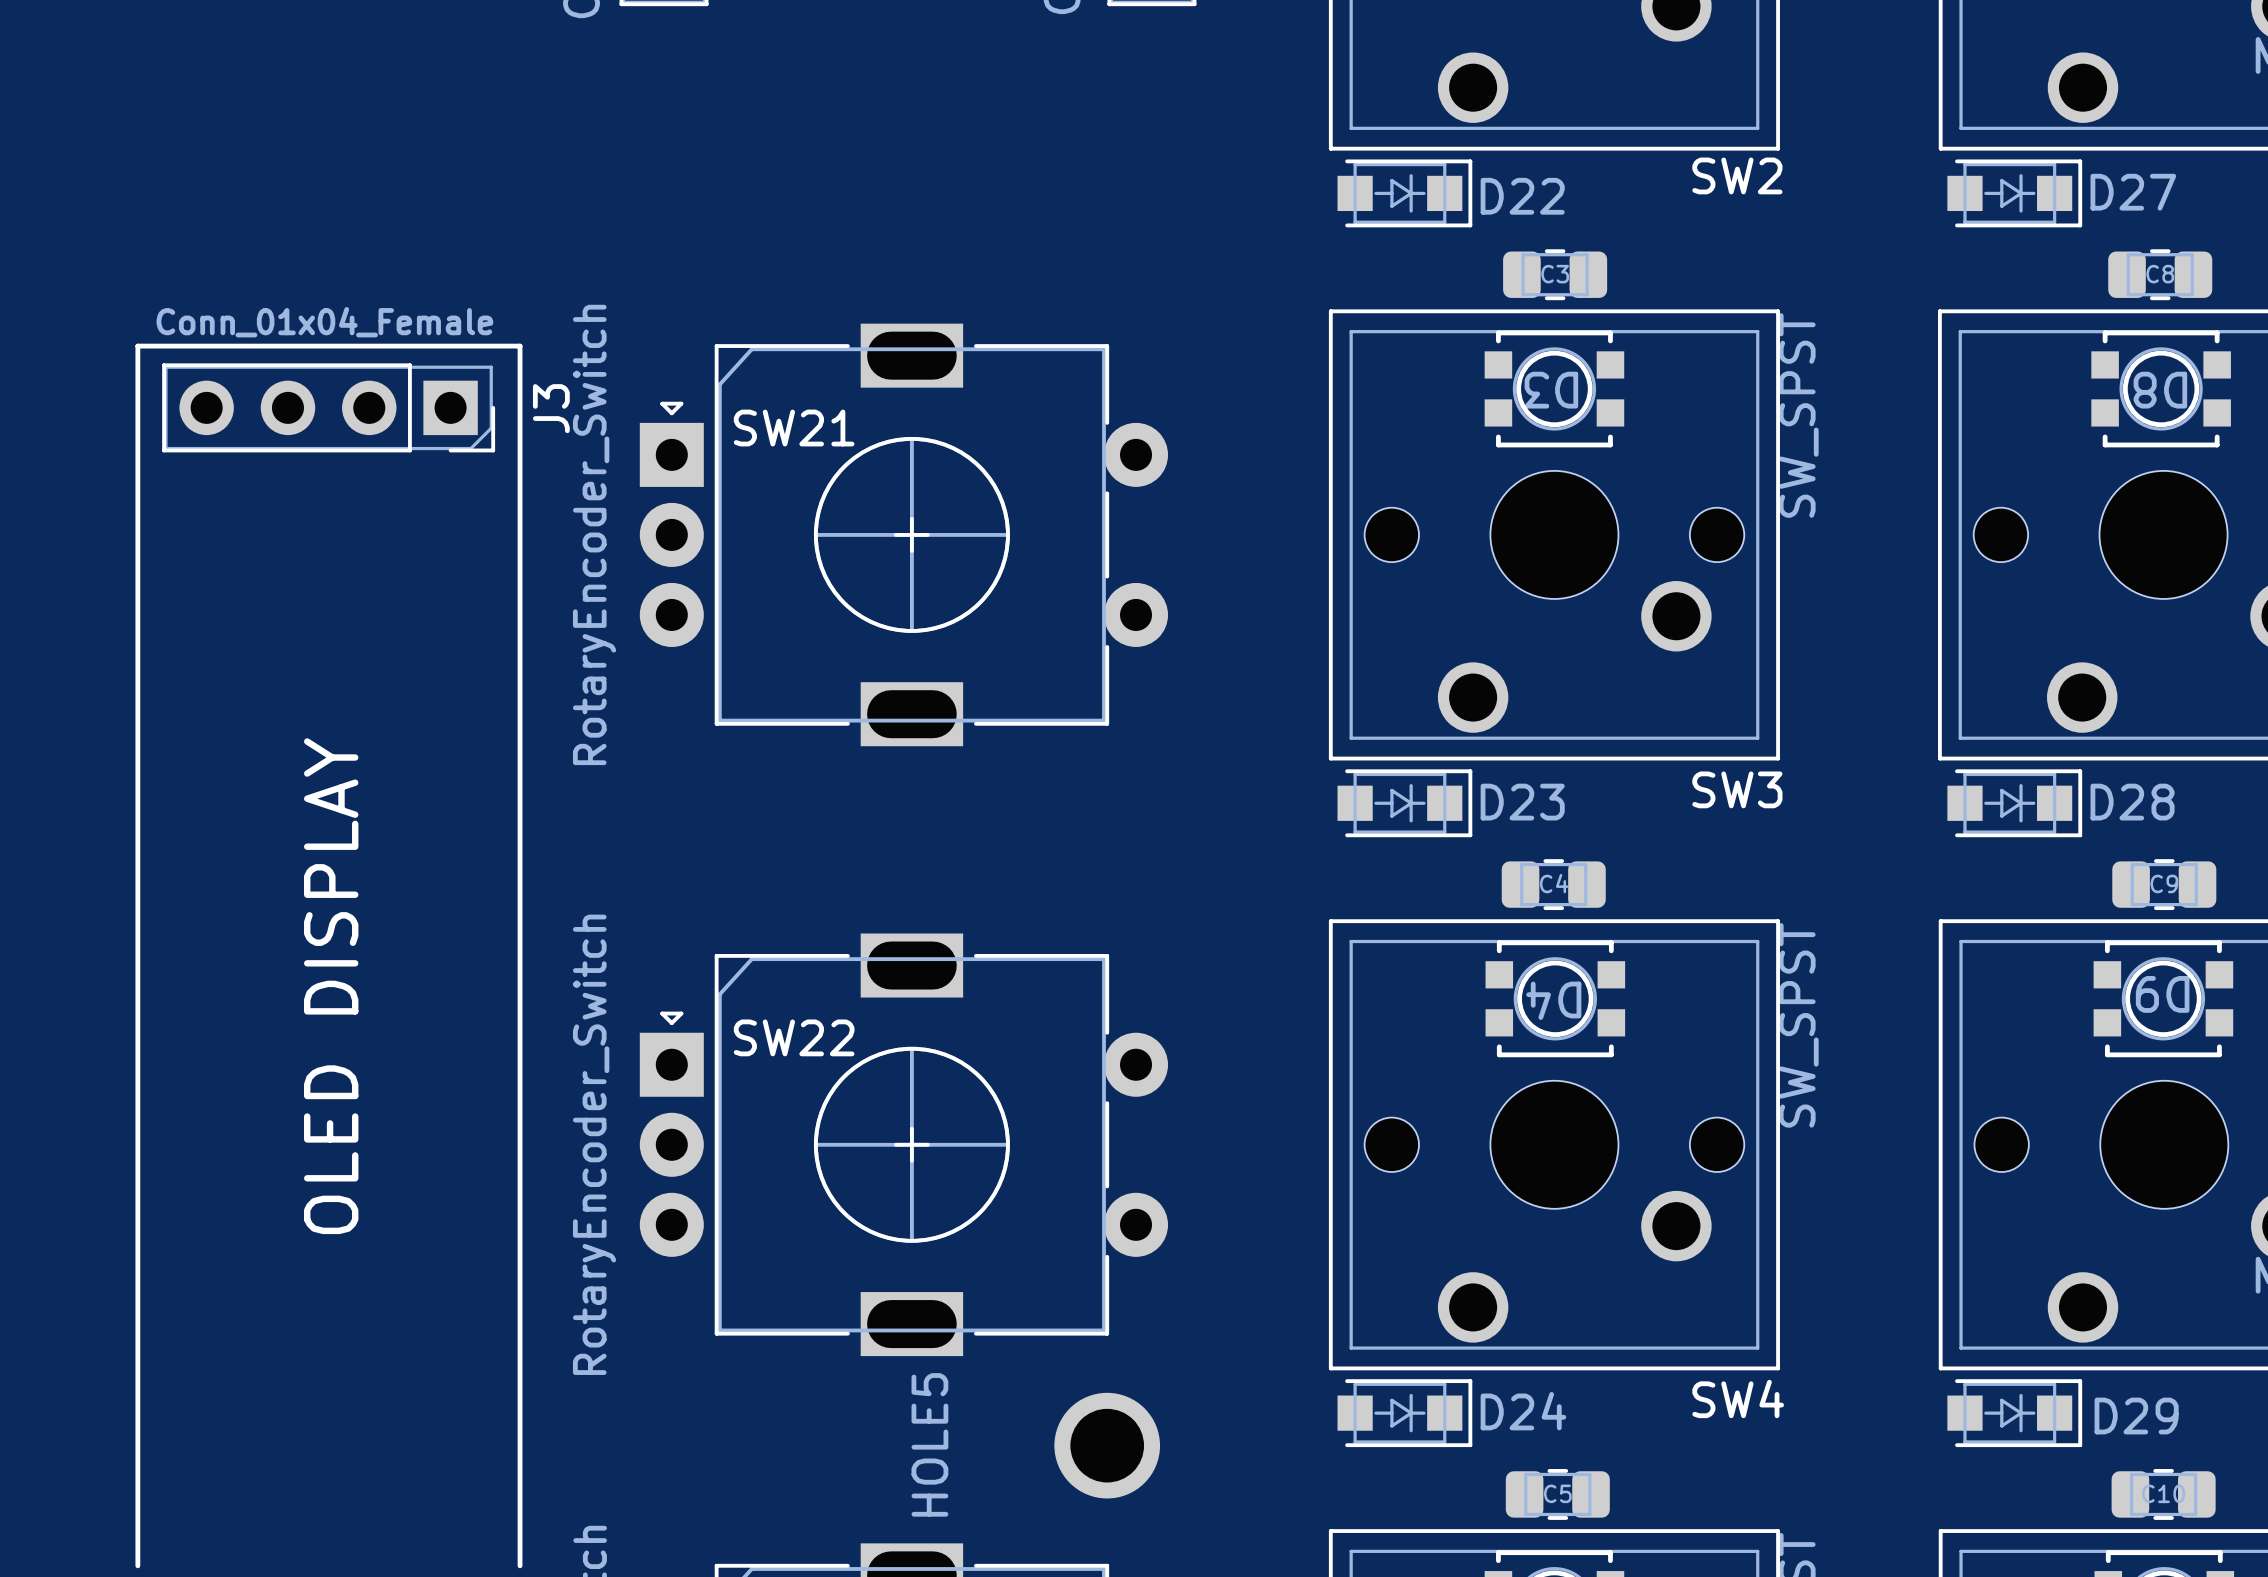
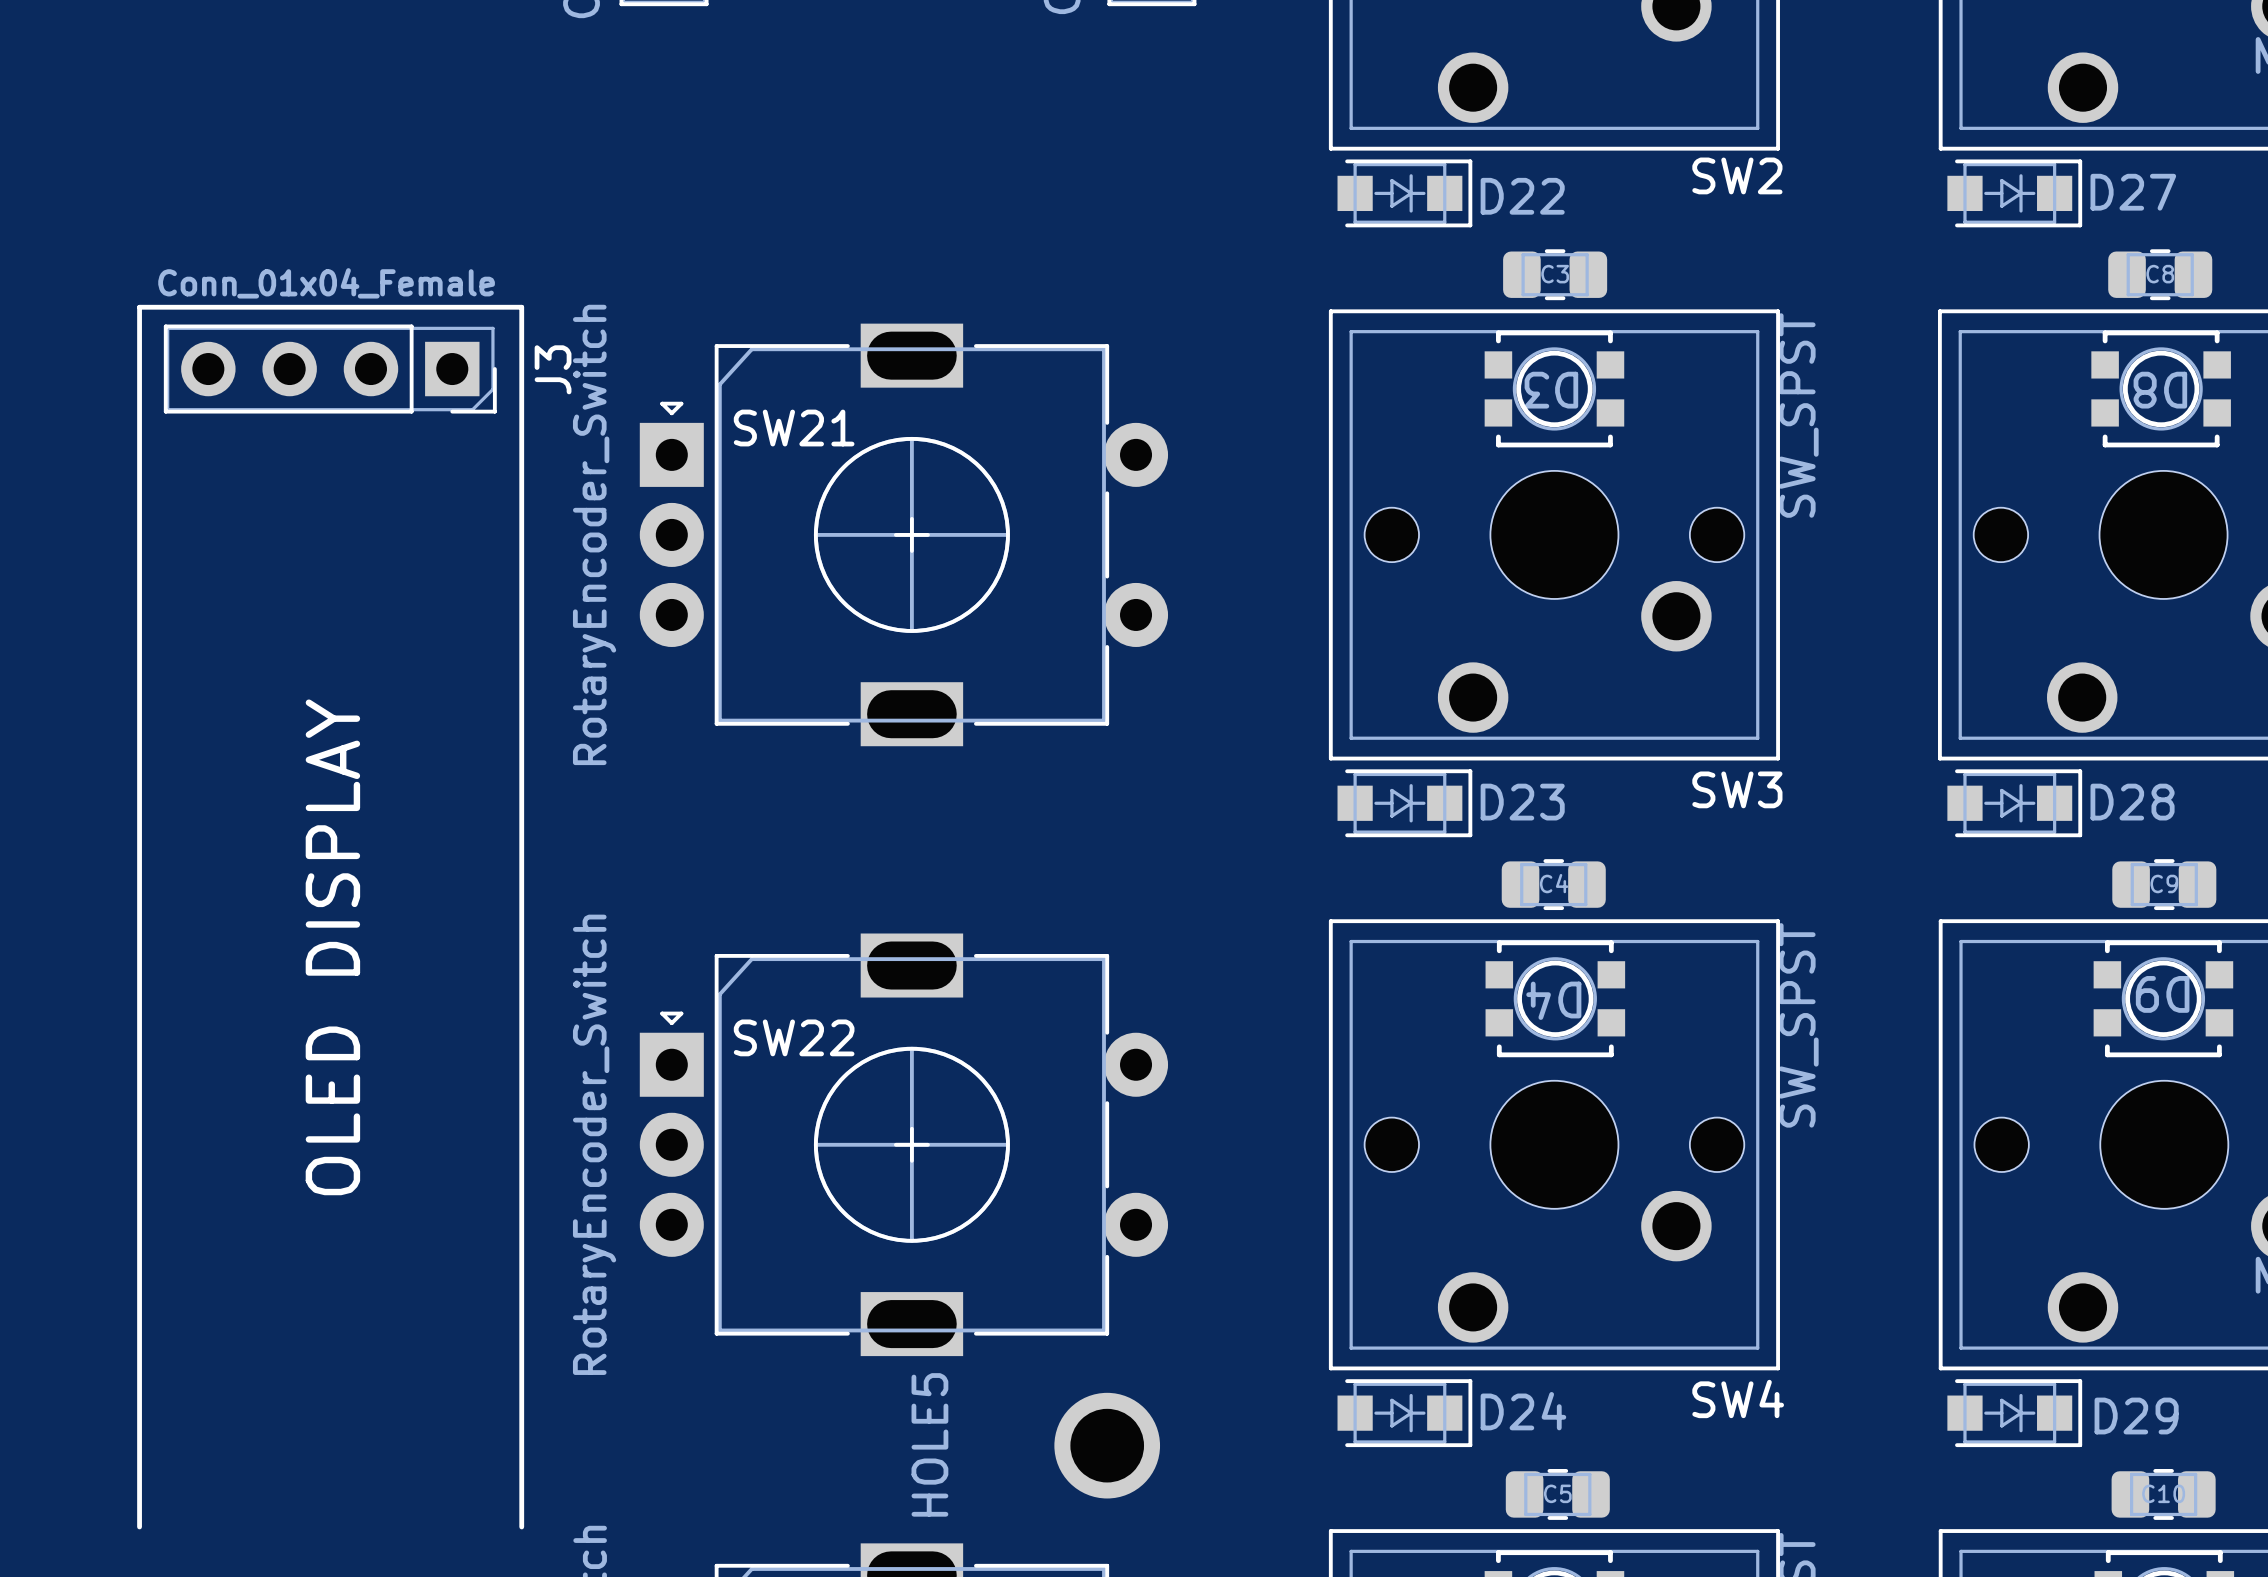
J3 position: (328, 407) -> (330, 369)
text position: OLED DISPLAY (331, 986) -> OLED DISPLAY (332, 947)
line: (137, 1565) (137, 346) (520, 346) (520, 1565) -> (139, 1526) (139, 307) (521, 307) (521, 1526)

